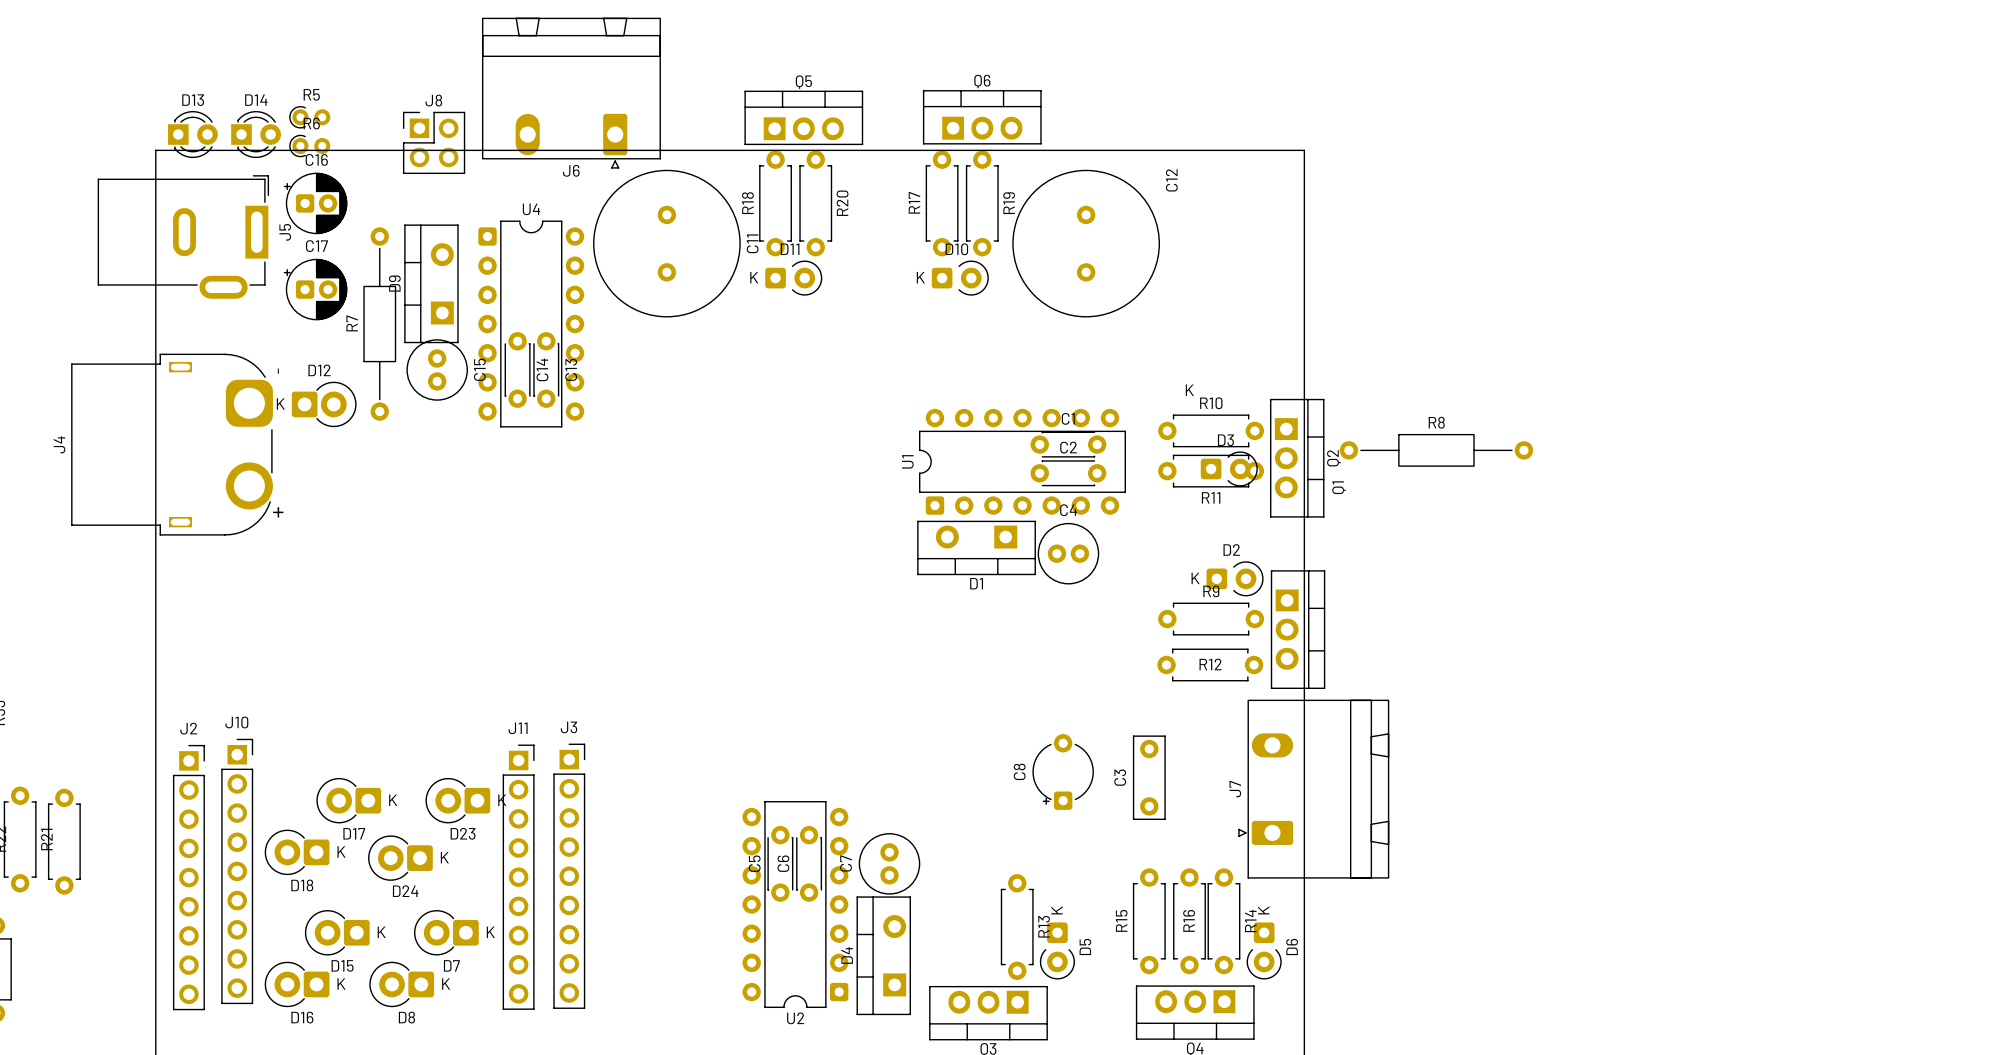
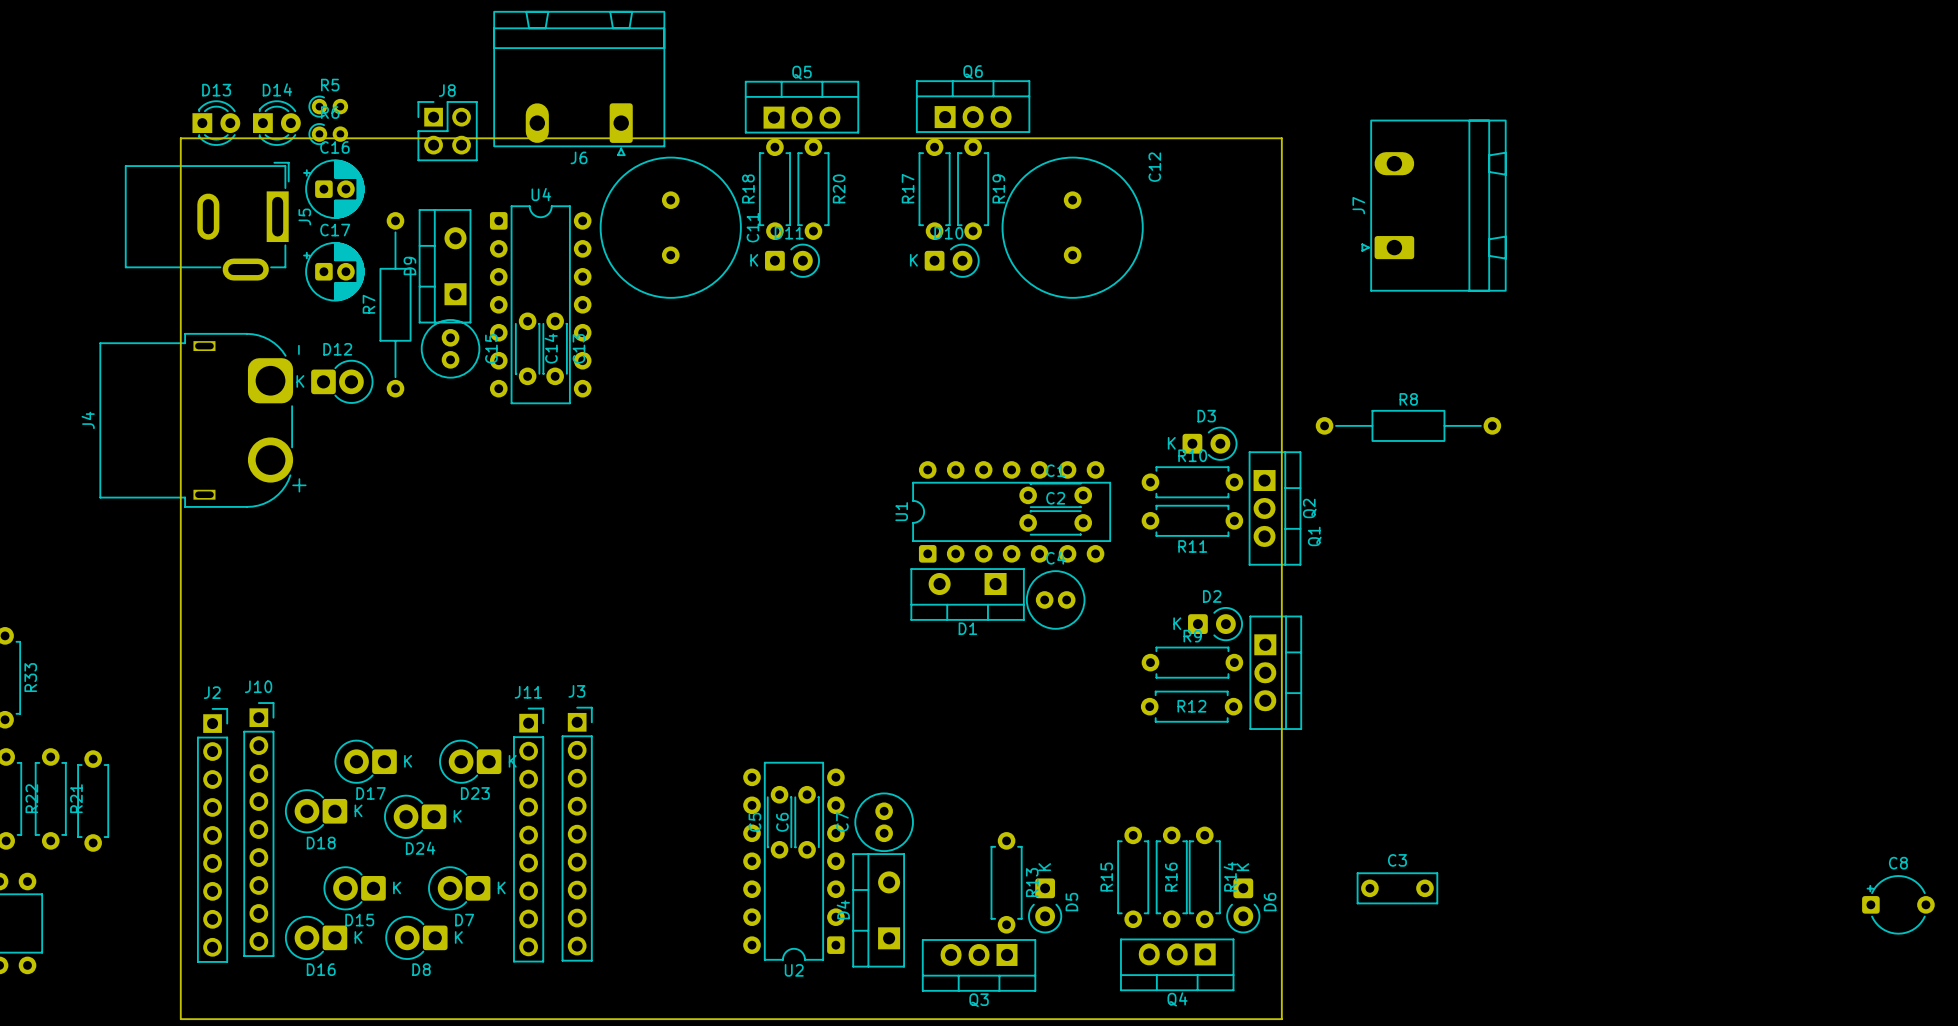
D3 text position: K (1189, 390) -> K (1171, 443)
R10 position: (1211, 430) -> (1192, 482)
C1 position: (1068, 444) -> (1055, 495)
Q2 position: (1297, 458) -> (1275, 508)
U1 position: (1022, 461) -> (1011, 511)
R11 position: (1211, 471) -> (1192, 520)
C2 position: (1068, 473) -> (1055, 522)
D1 position: (976, 547) -> (967, 594)
C4 position: (1068, 553) -> (1055, 599)
D2 position: (1235, 578) -> (1215, 624)
R9 position: (1211, 619) -> (1192, 662)
Q1 position: (1298, 629) -> (1275, 672)
R12 position: (1210, 664) -> (1191, 706)
C8 rotation: 0° (1063, 771) -> 90° clockwise (1898, 904)
C8 position: (1063, 771) -> (1898, 904)
C3 rotation: 0° (1149, 777) -> 90° clockwise (1397, 888)
C3 position: (1149, 777) -> (1397, 888)
J7 position: (1313, 789) -> (1434, 205)

